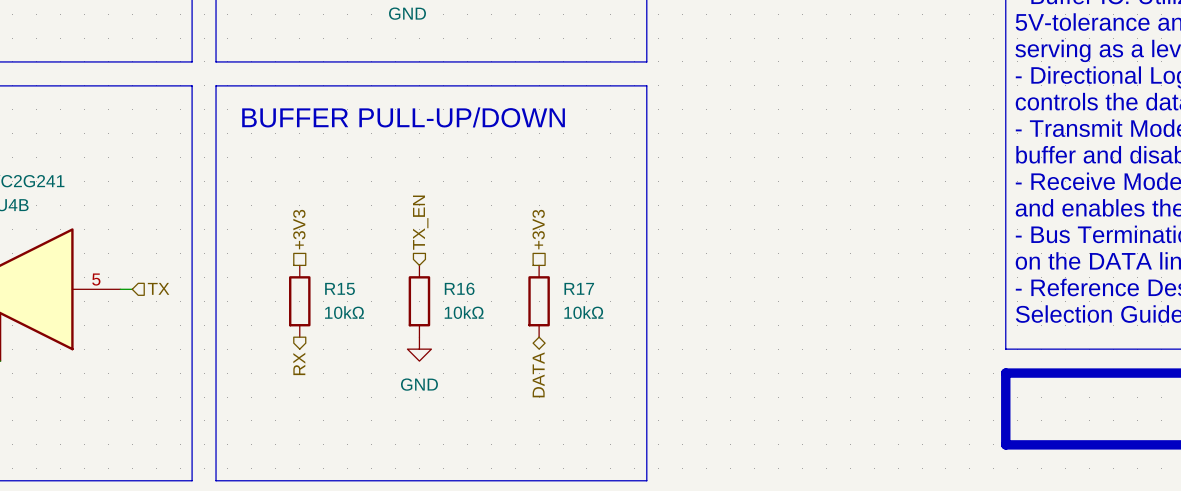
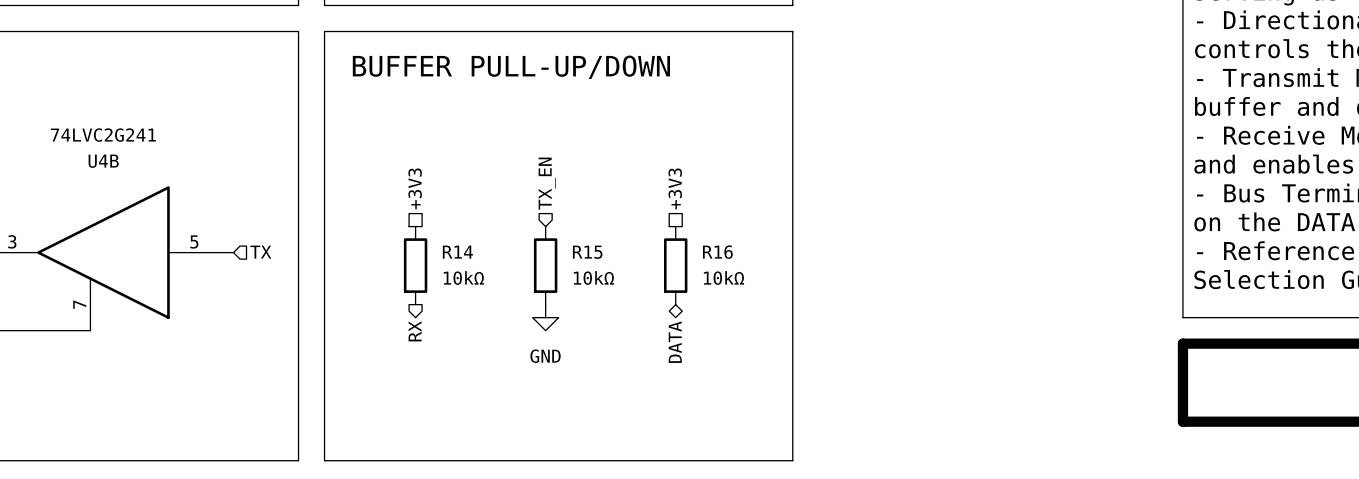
R15 name: R15 (340, 288) -> R14 (457, 252)
R16 name: R16 (459, 288) -> R15 (587, 252)
R17 name: R17 (579, 288) -> R16 (717, 252)

